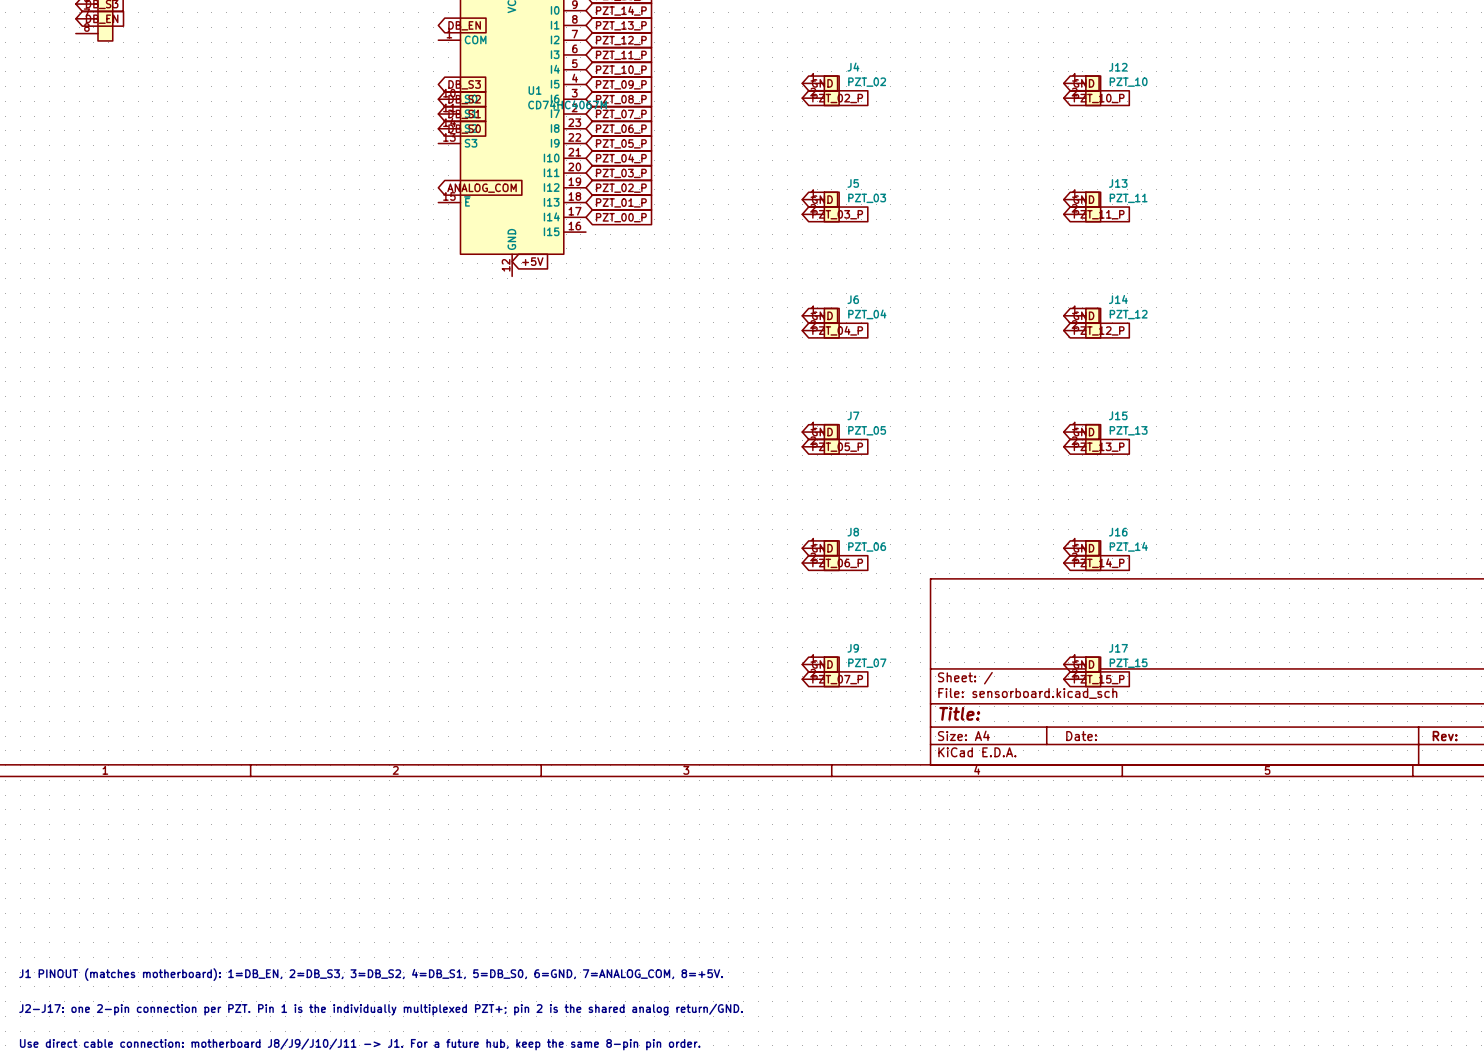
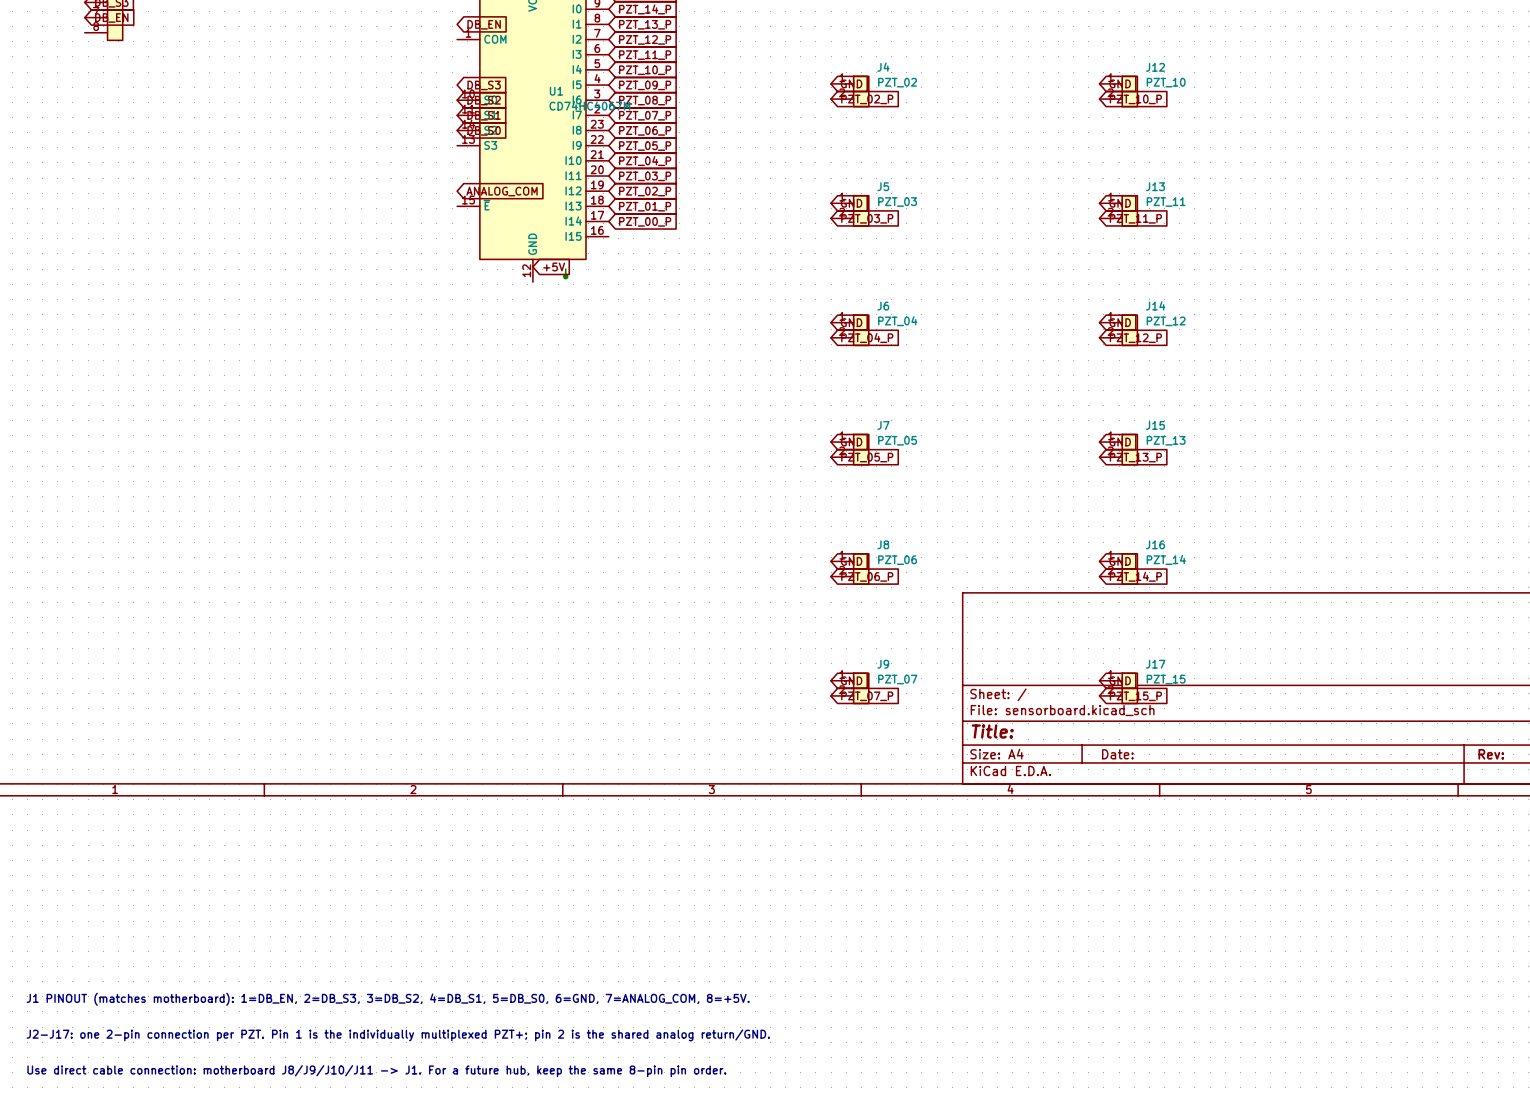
wire: none -> (565, 269) (565, 276)
junction: none -> (565, 276)

